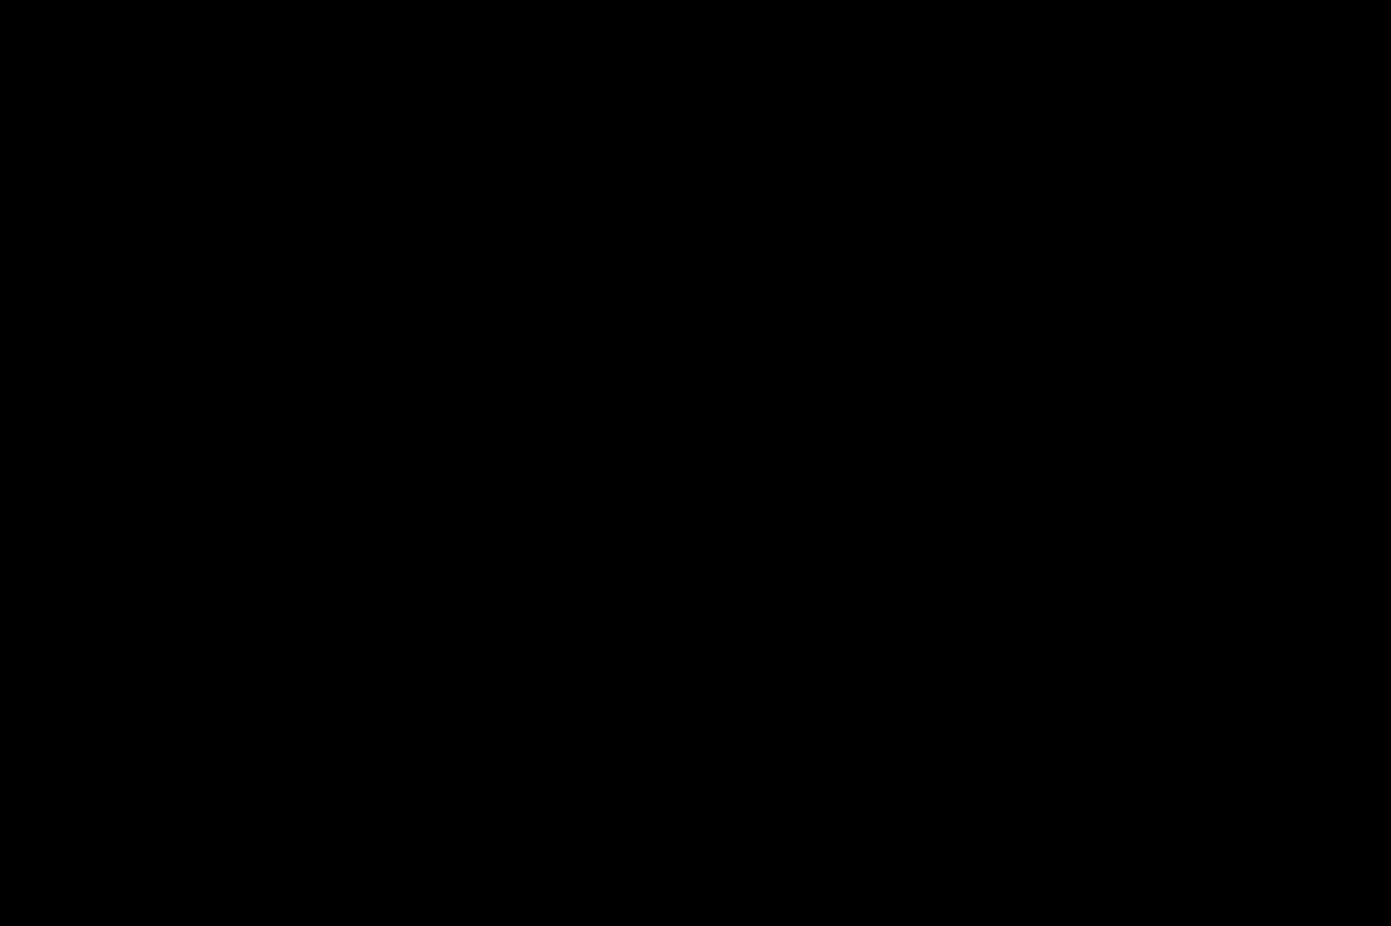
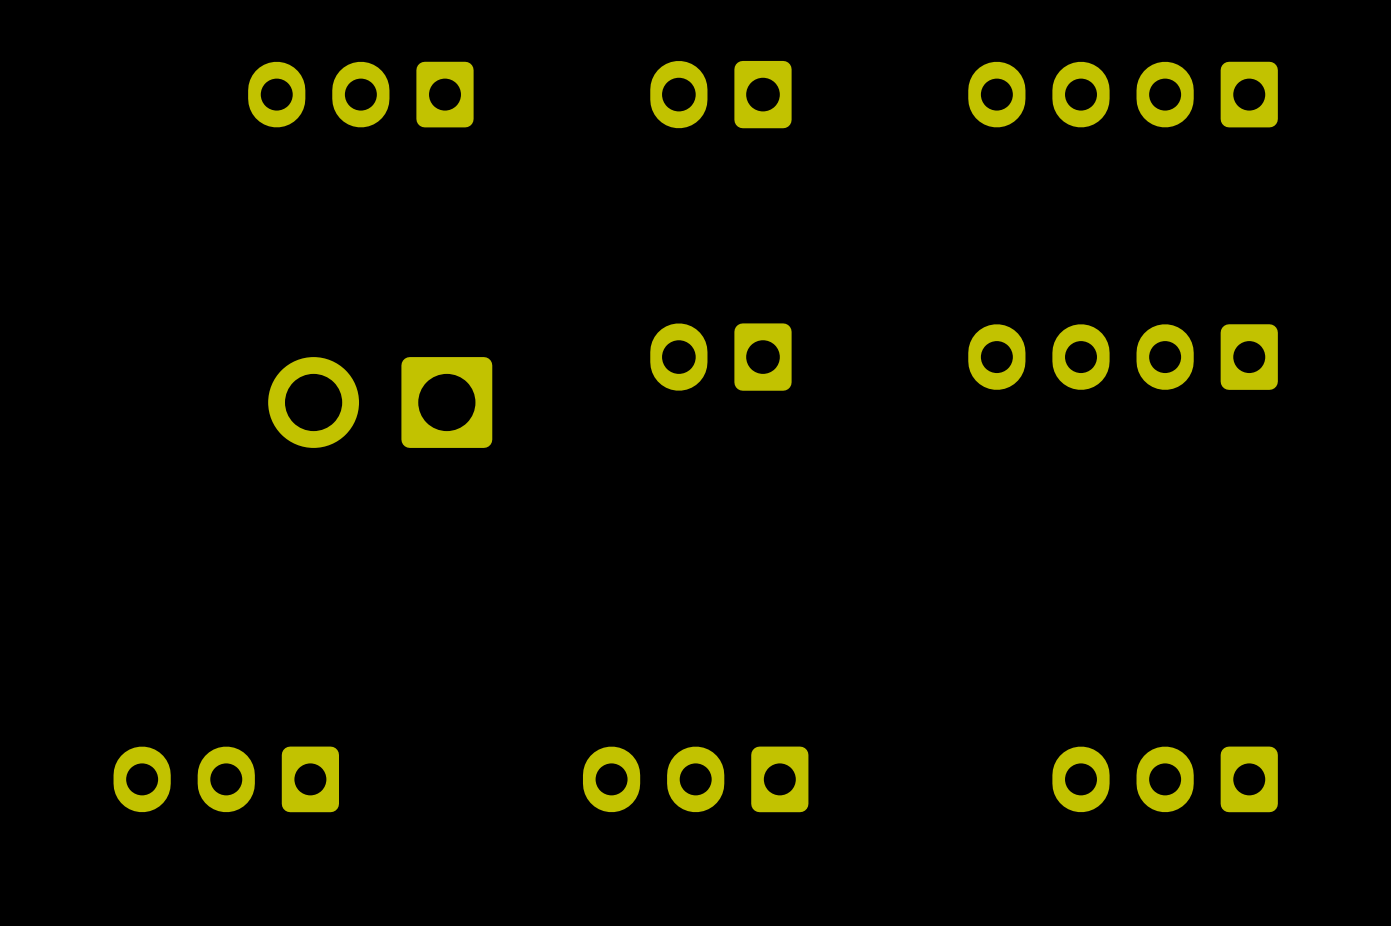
part: none -> (360, 94)
part: none -> (720, 94)
part: none -> (1123, 94)
part: none -> (720, 357)
part: none -> (1123, 357)
part: none -> (380, 402)
part: none -> (226, 779)
part: none -> (695, 779)
part: none -> (1165, 779)

